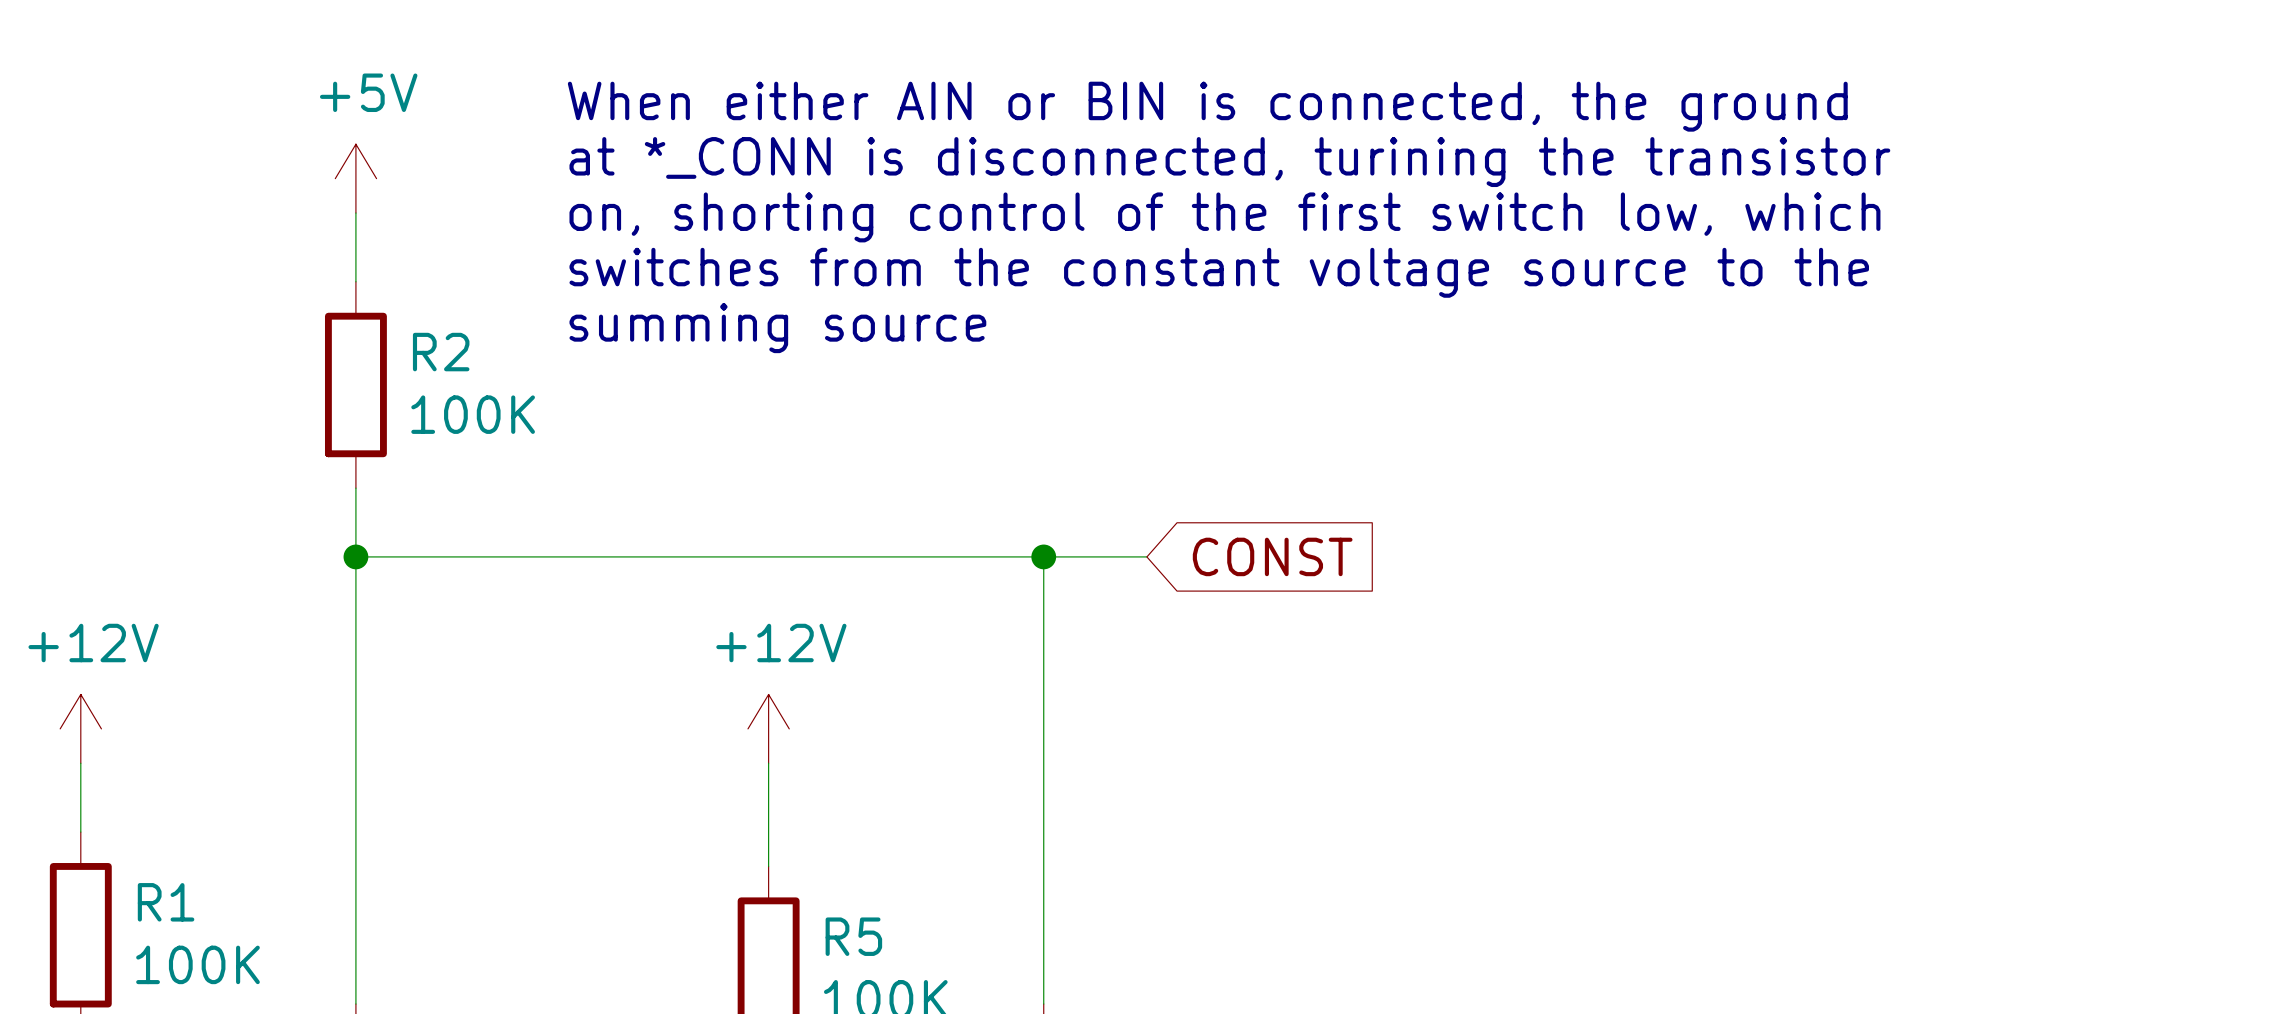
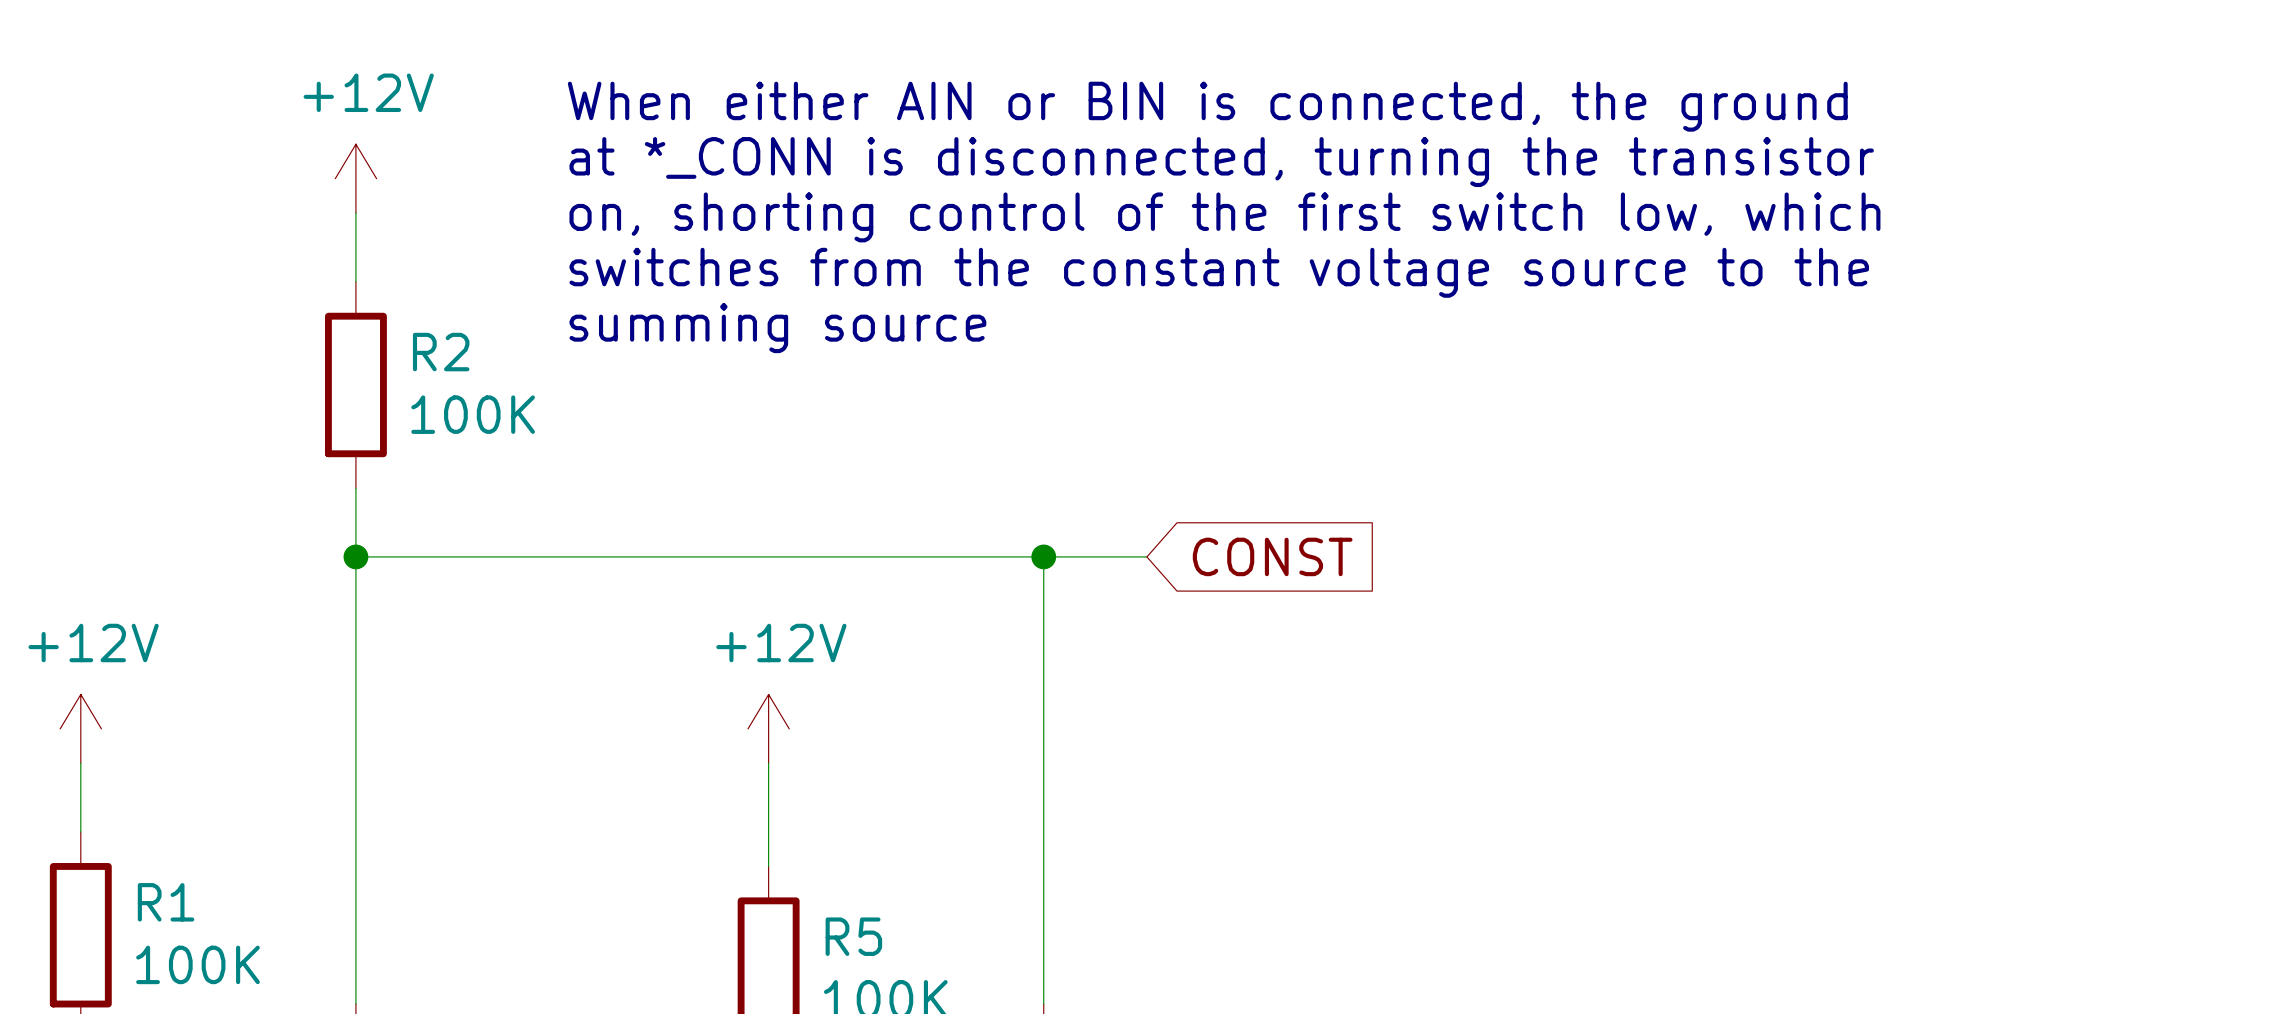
text: at *_CONN is disconnected, turining the transistor (1229, 162) -> at *_CONN is disconnected, turning the transistor (1221, 162)
power symbol: +5V (355, 178) -> +12V (355, 178)

